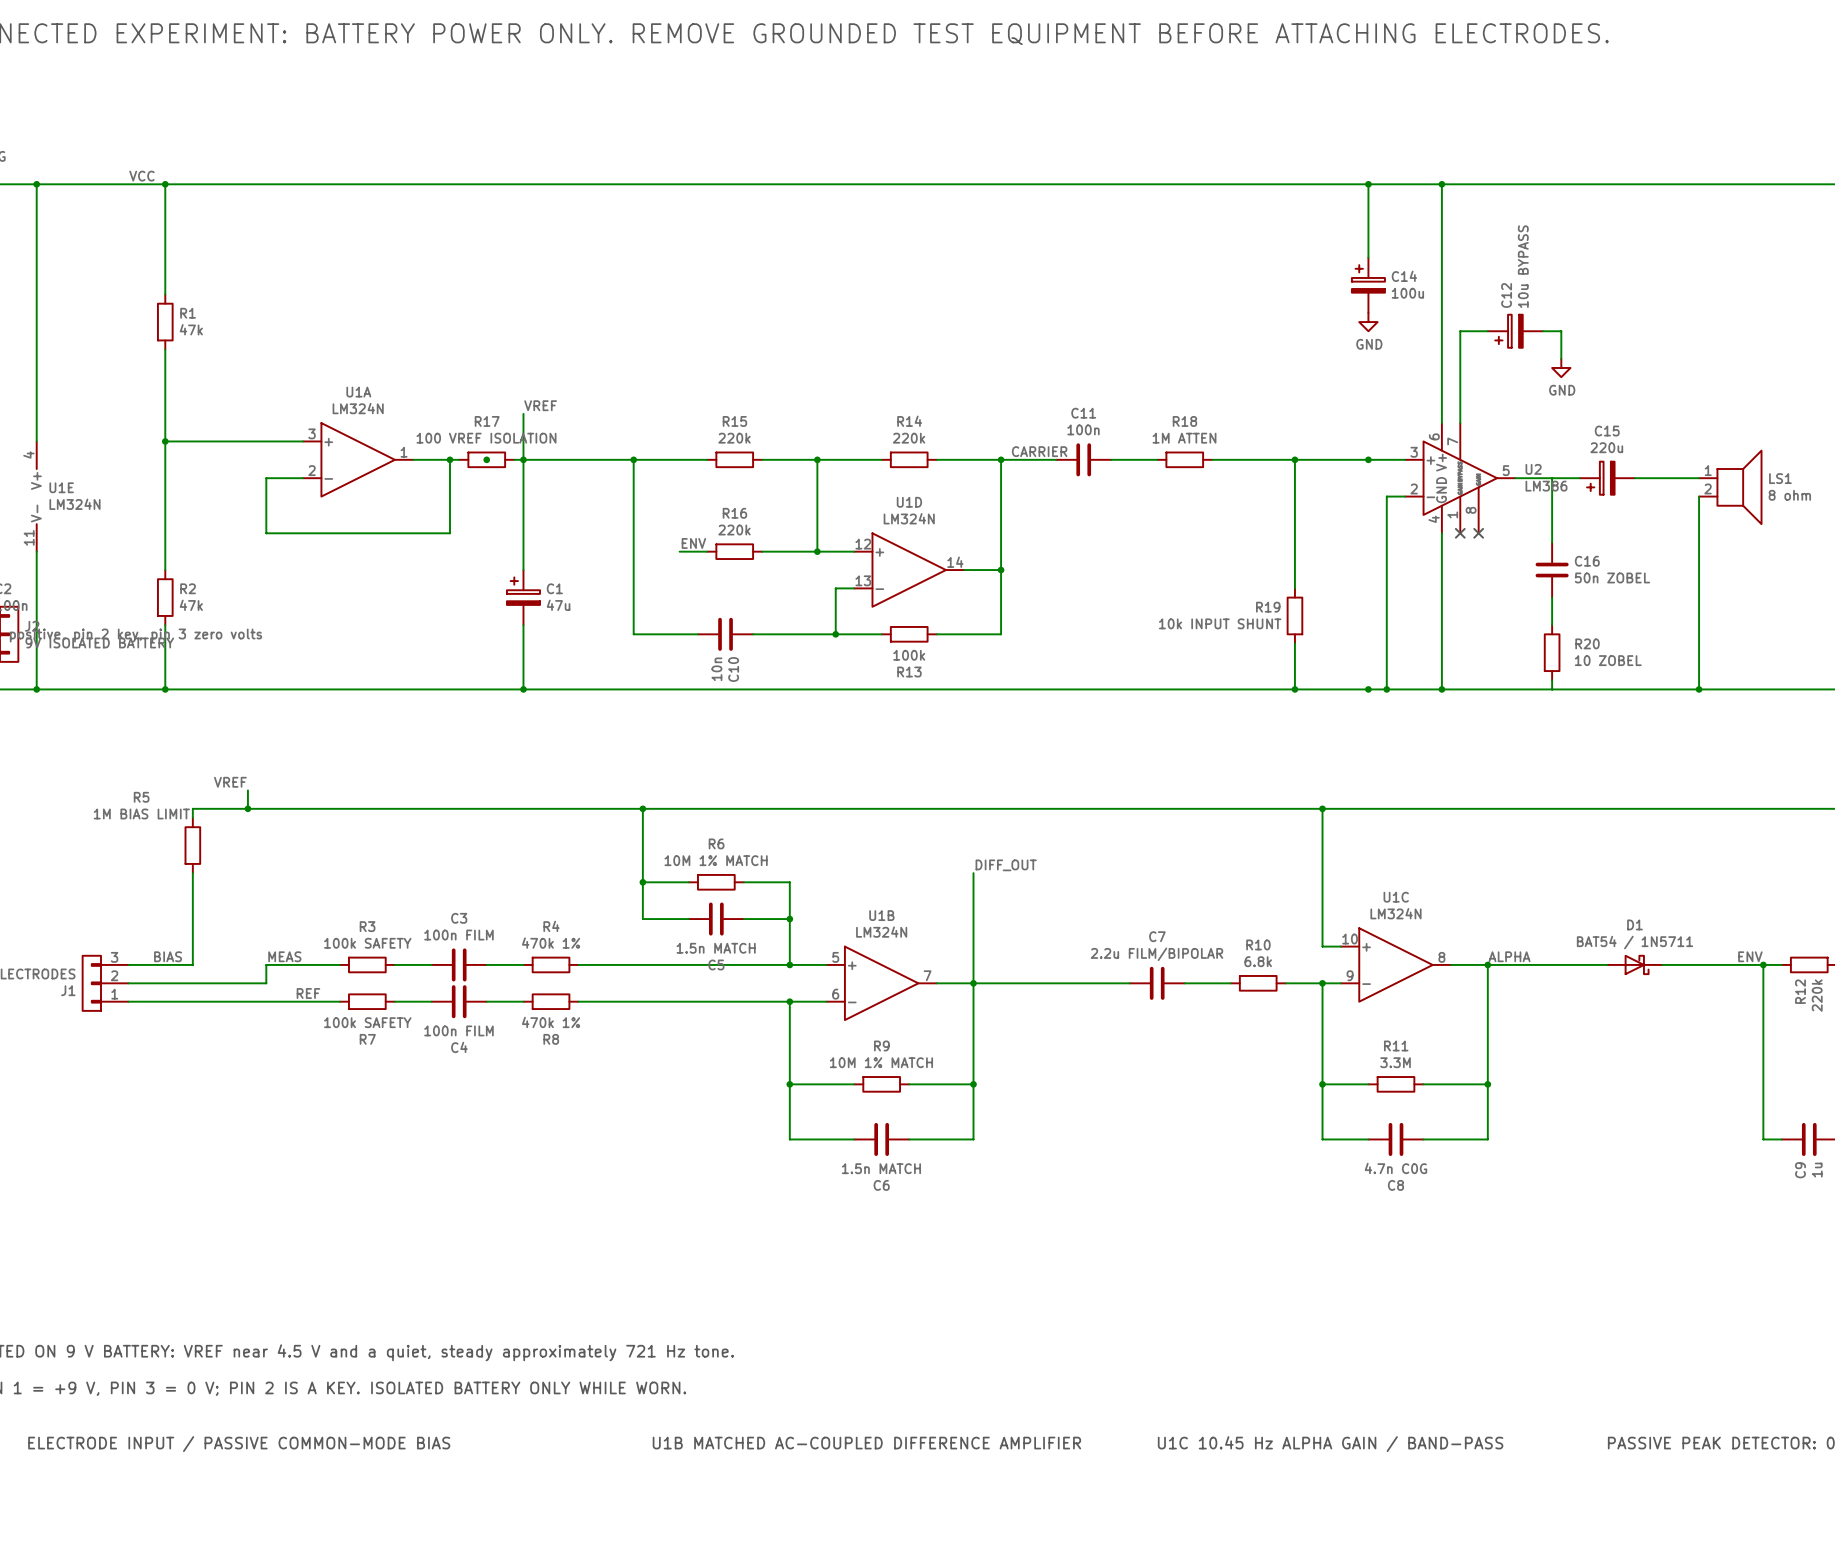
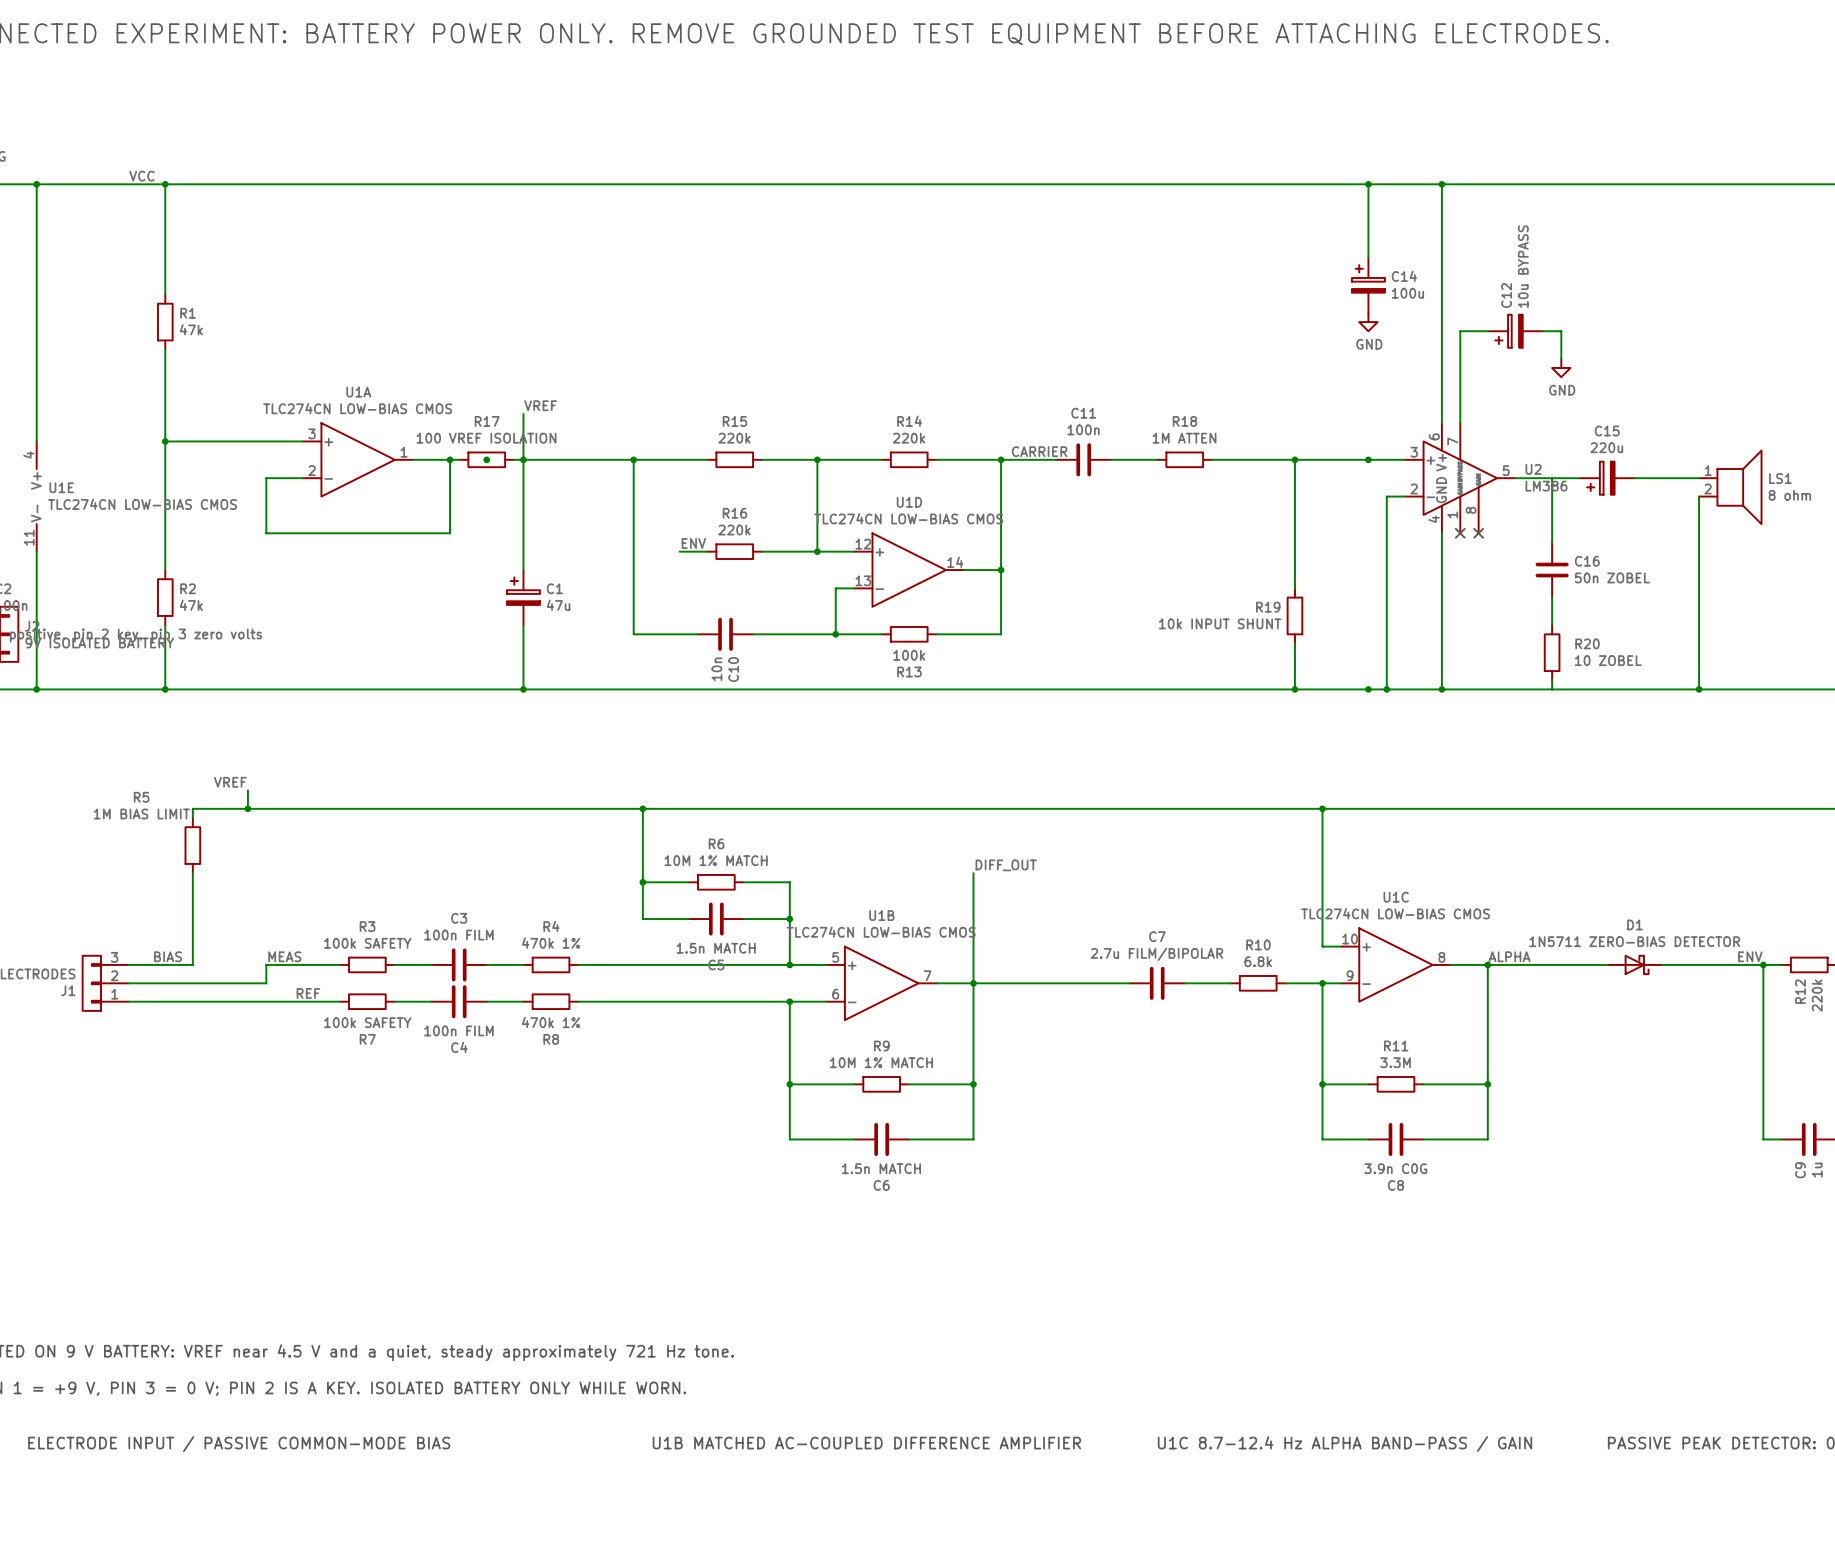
U1A value: LM324N (358, 408) -> TLC274CN LOW-BIAS CMOS (357, 408)
U1E value: LM324N (74, 504) -> TLC274CN LOW-BIAS CMOS (142, 504)
U1D value: LM324N (909, 518) -> TLC274CN LOW-BIAS CMOS (908, 518)
U1C value: LM324N (1395, 913) -> TLC274CN LOW-BIAS CMOS (1395, 913)
U1B value: LM324N (881, 932) -> TLC274CN LOW-BIAS CMOS (881, 932)
D1 value: BAT54 / 1N5711 (1634, 942) -> 1N5711 ZERO-BIAS DETECTOR (1634, 941)
C7 value: 2.2u FILM/BIPOLAR (1156, 954) -> 2.7u FILM/BIPOLAR (1156, 954)
C8 value: 4.7n C0G (1395, 1168) -> 3.9n C0G (1395, 1168)
text: U1C 10.45 Hz ALPHA GAIN / BAND-PASS (1330, 1444) -> U1C 8.7-12.4 Hz ALPHA BAND-PASS / GAIN (1345, 1444)

